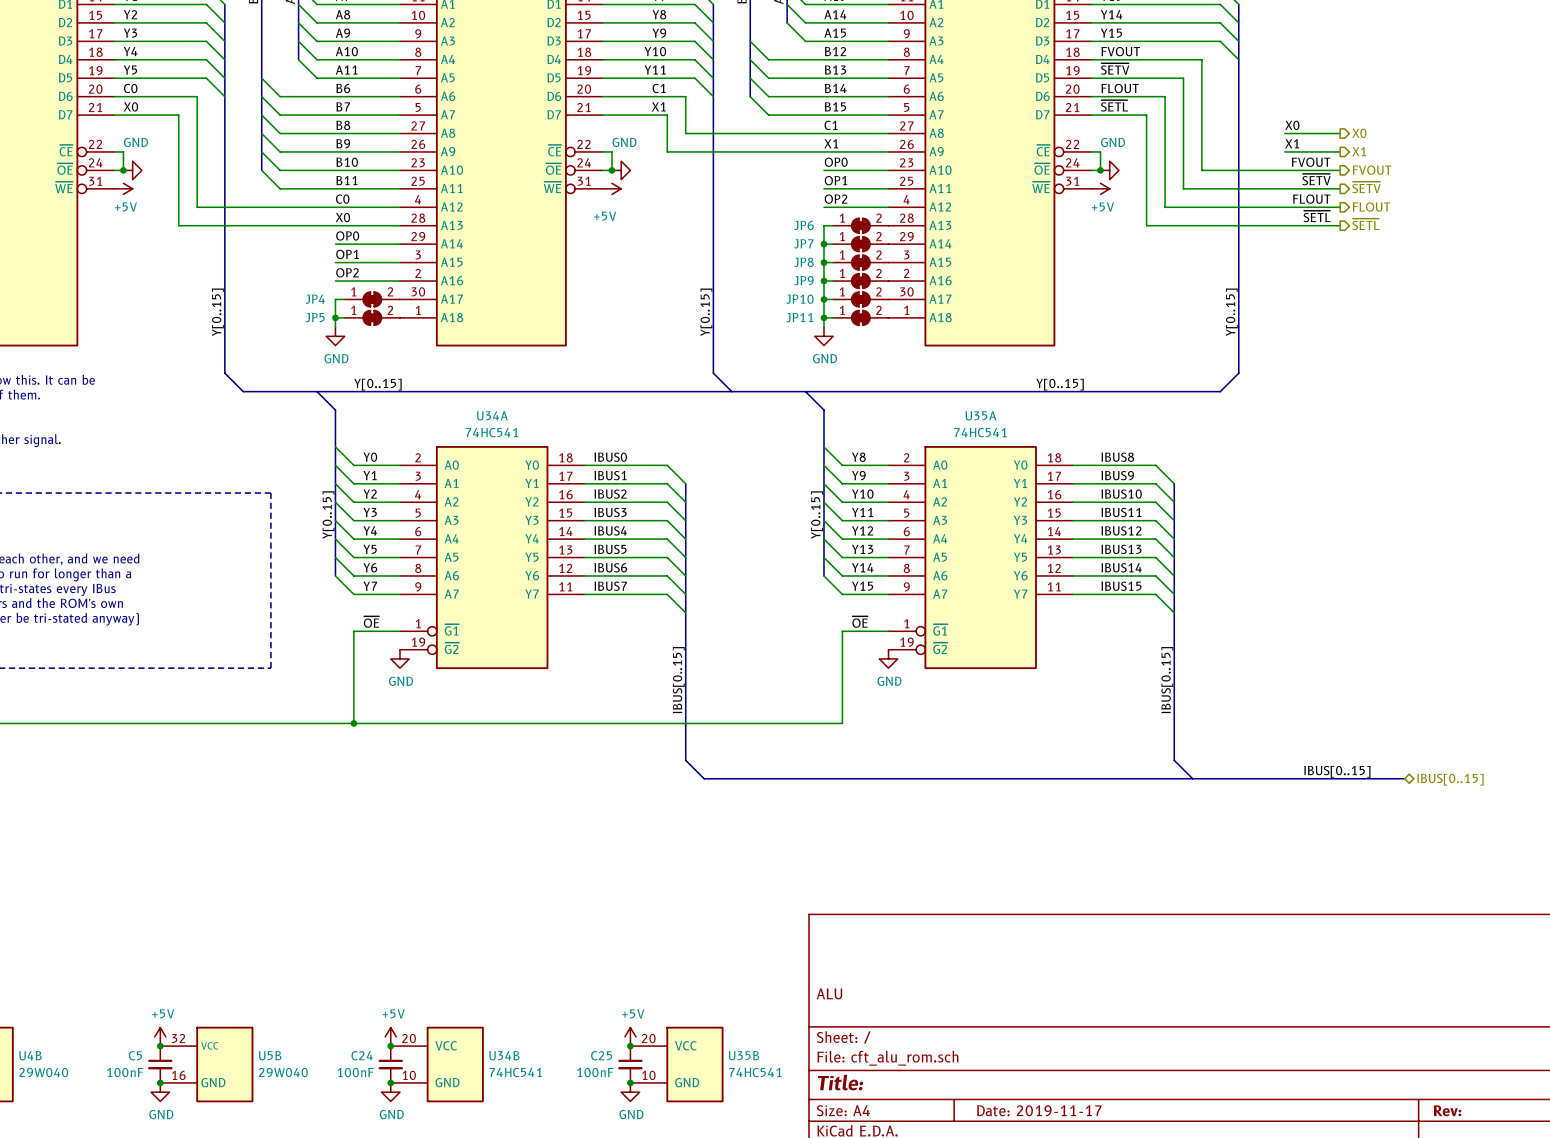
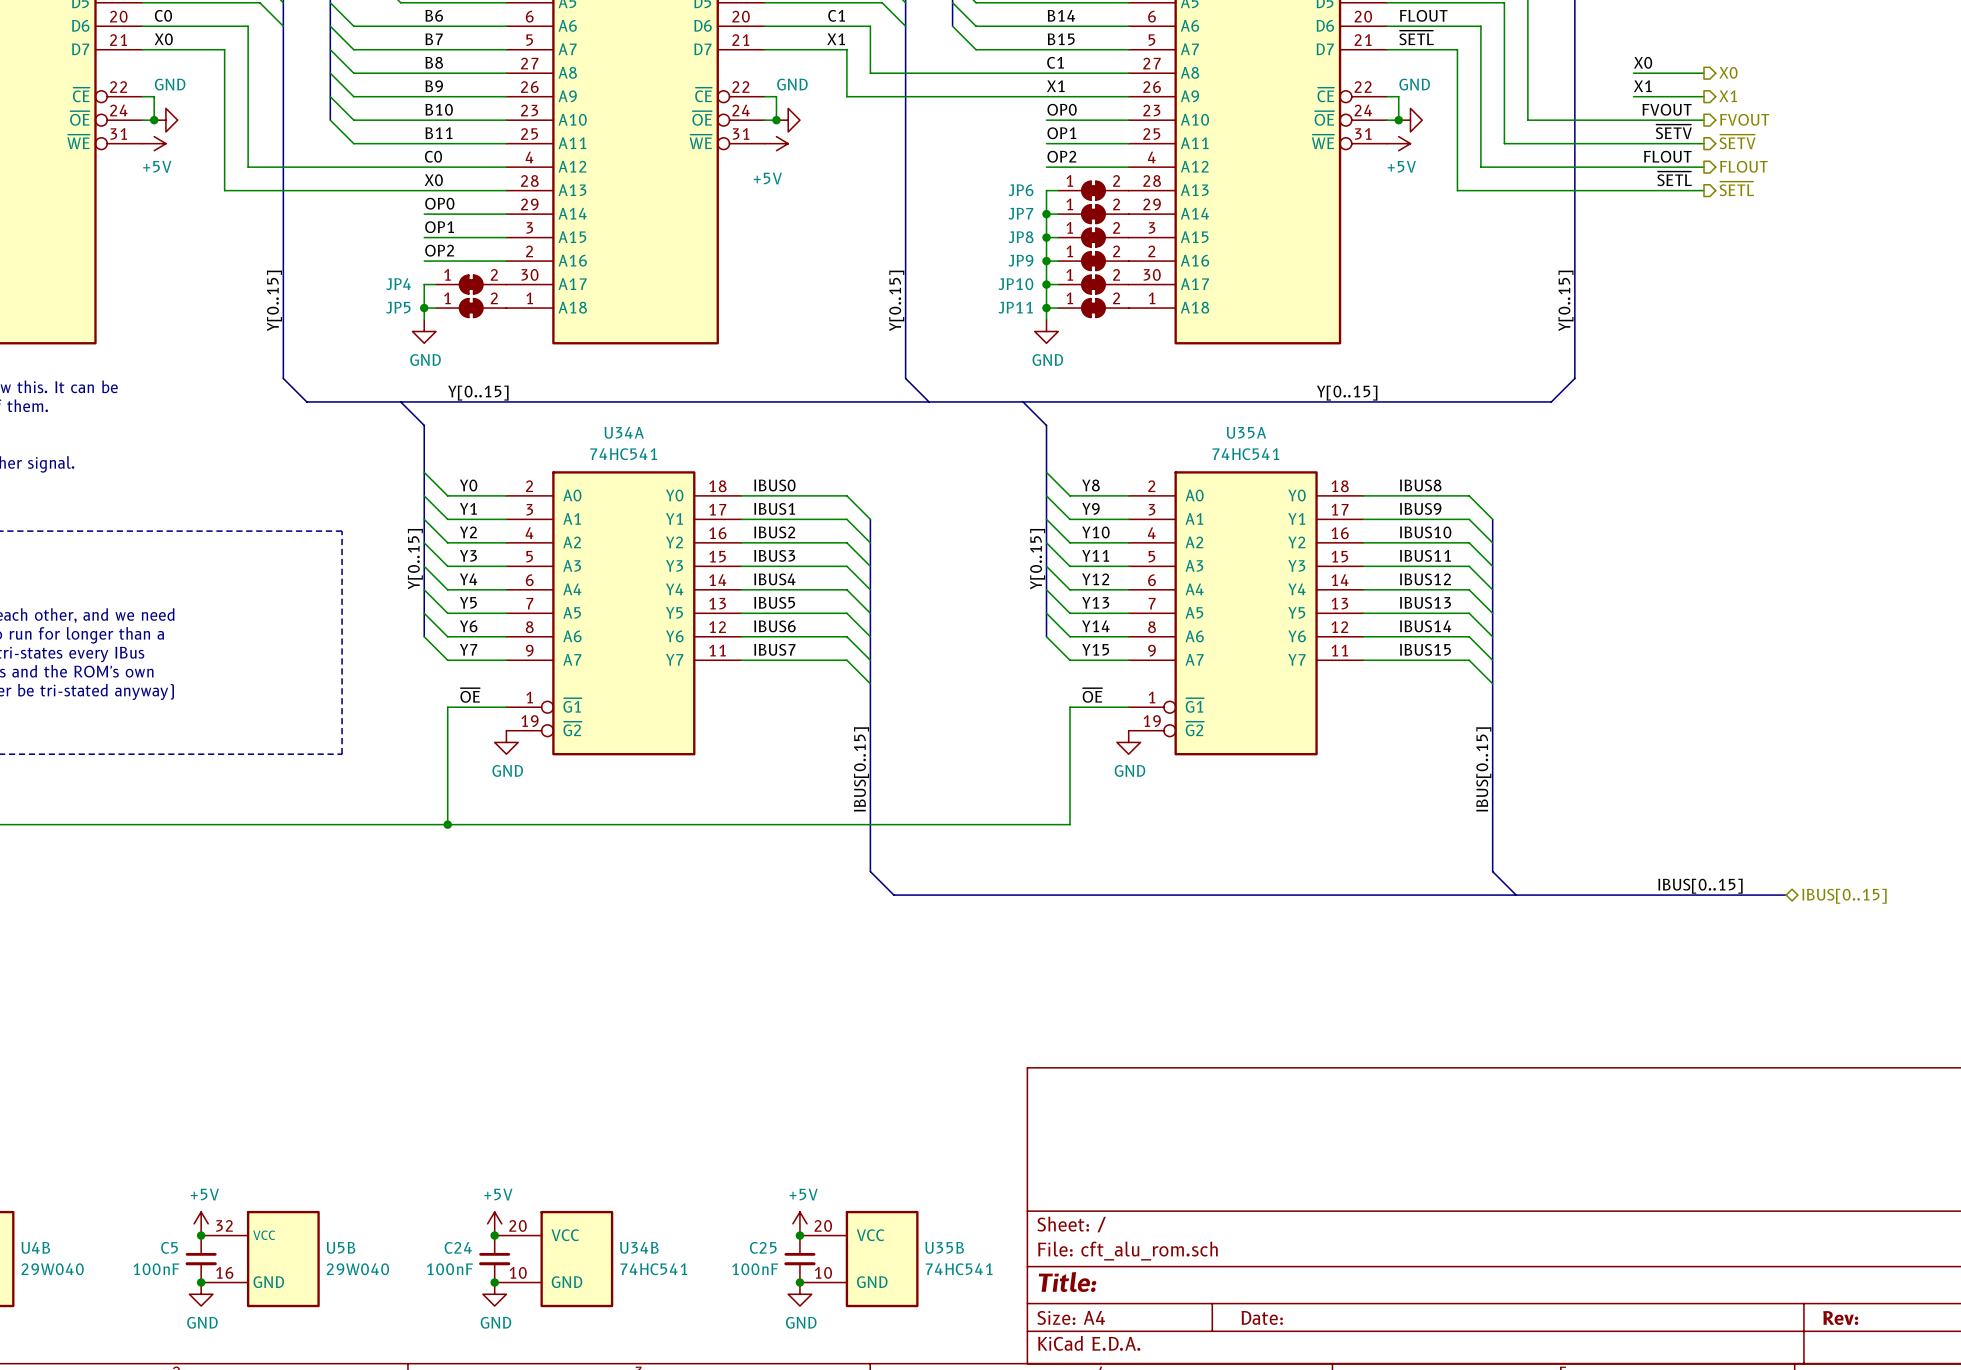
title block: ALU (829, 993) -> none
title block: Date: 2019-11-17 (1039, 1110) -> Date: (1262, 1317)

